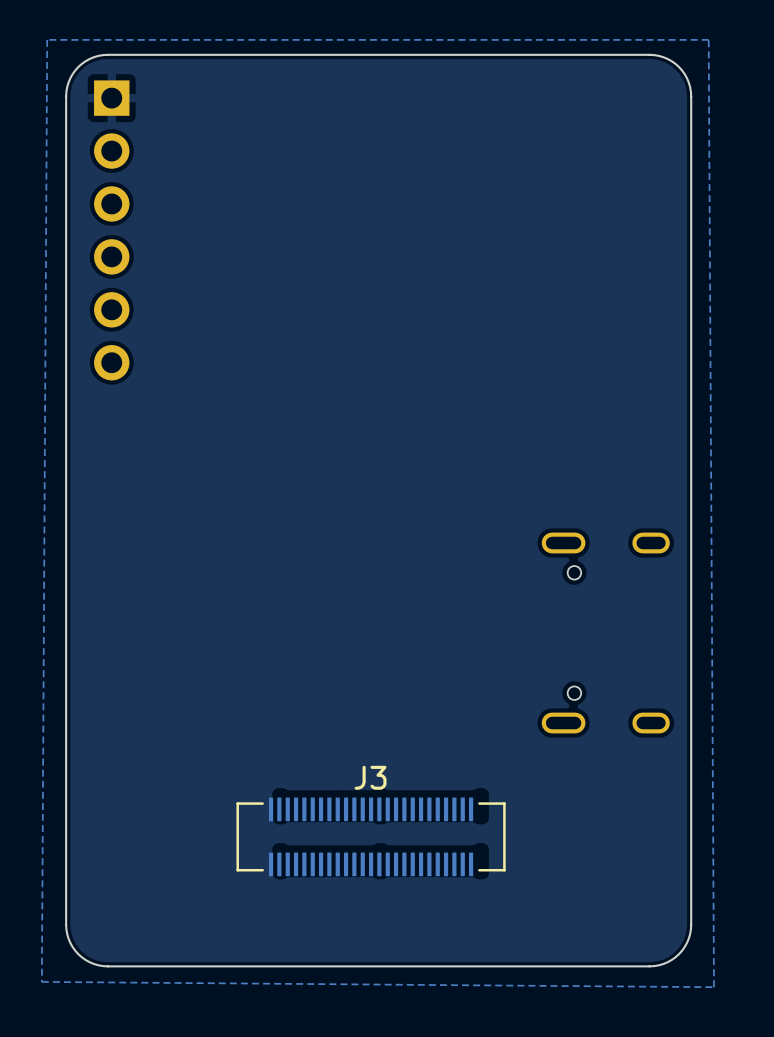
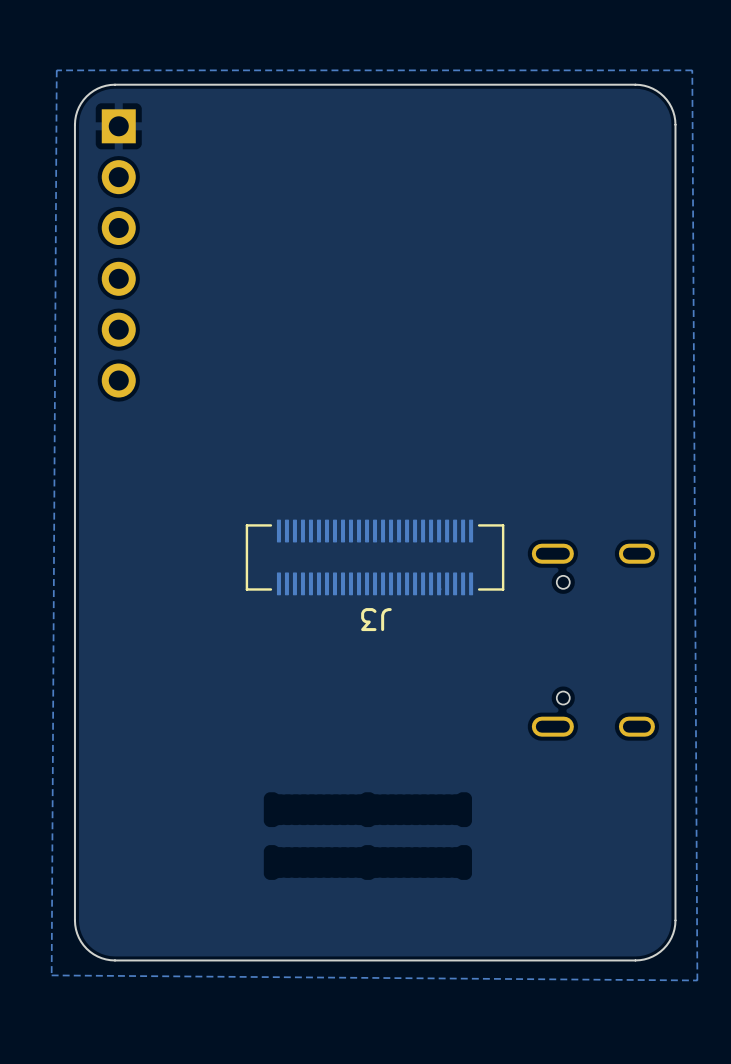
J3 name rotation: 0° (370, 777) -> 180° (376, 619)
J3 name position: J3 (370, 777) -> J3 (376, 619)
J3 position: (371, 836) -> (375, 557)

